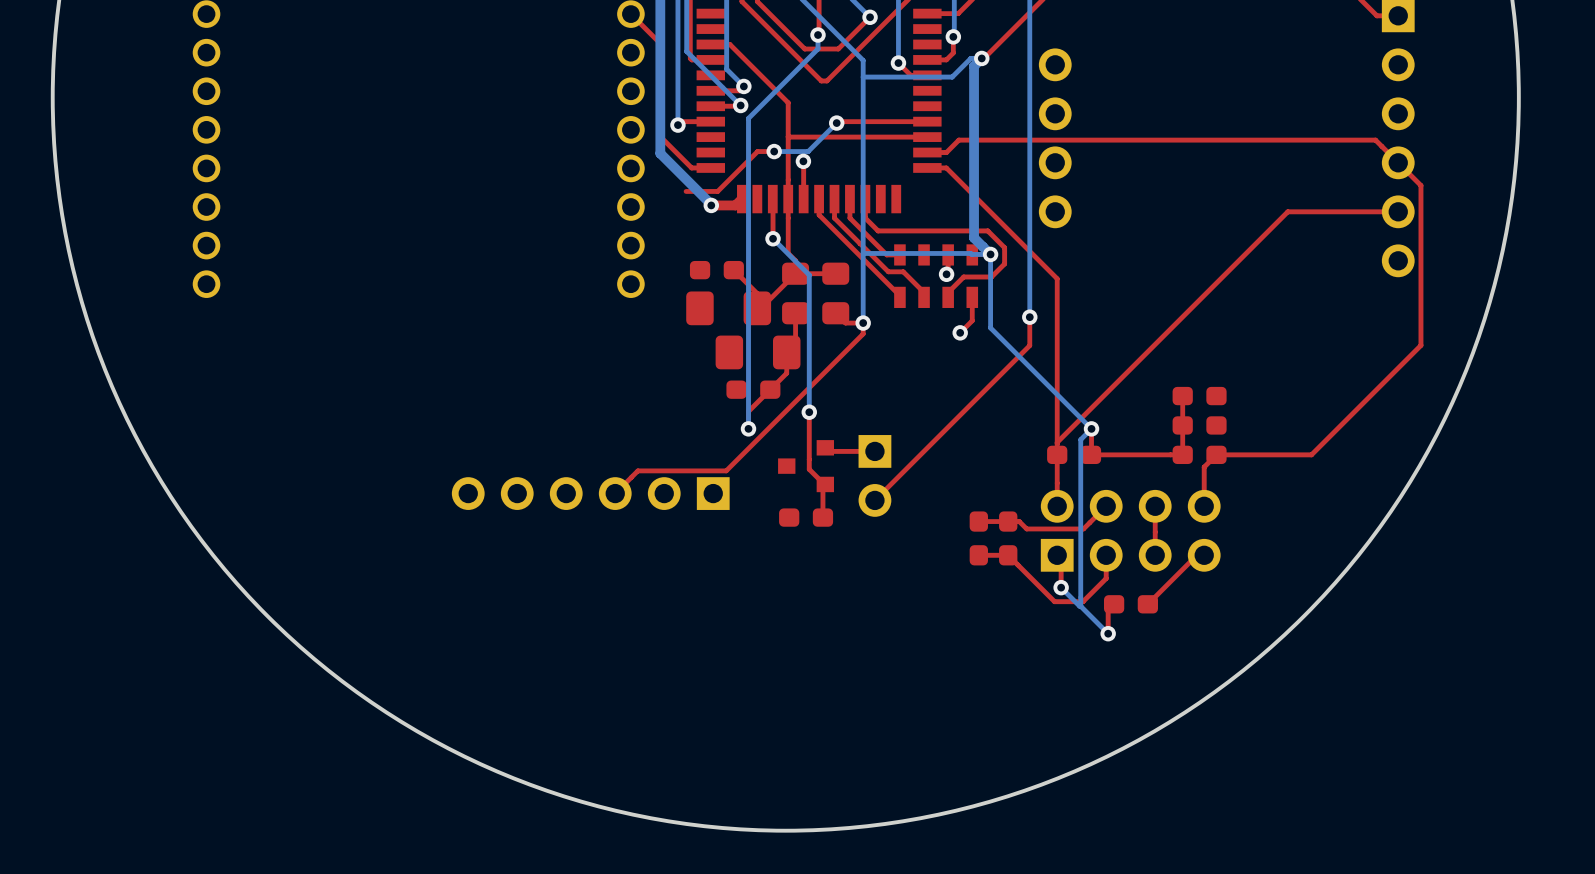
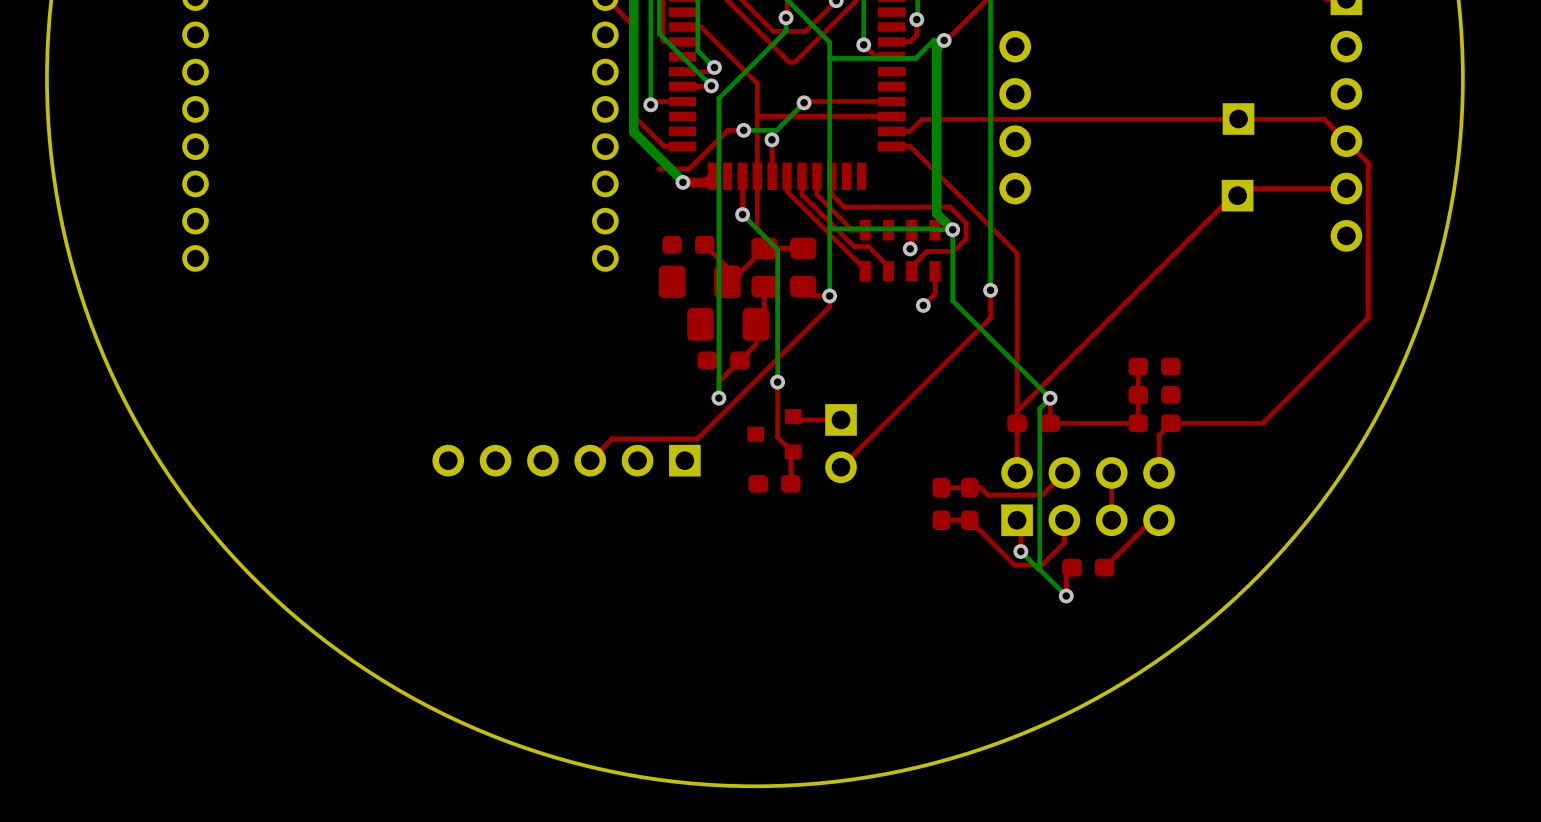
part: none -> (1238, 118)
part: none -> (1237, 195)

